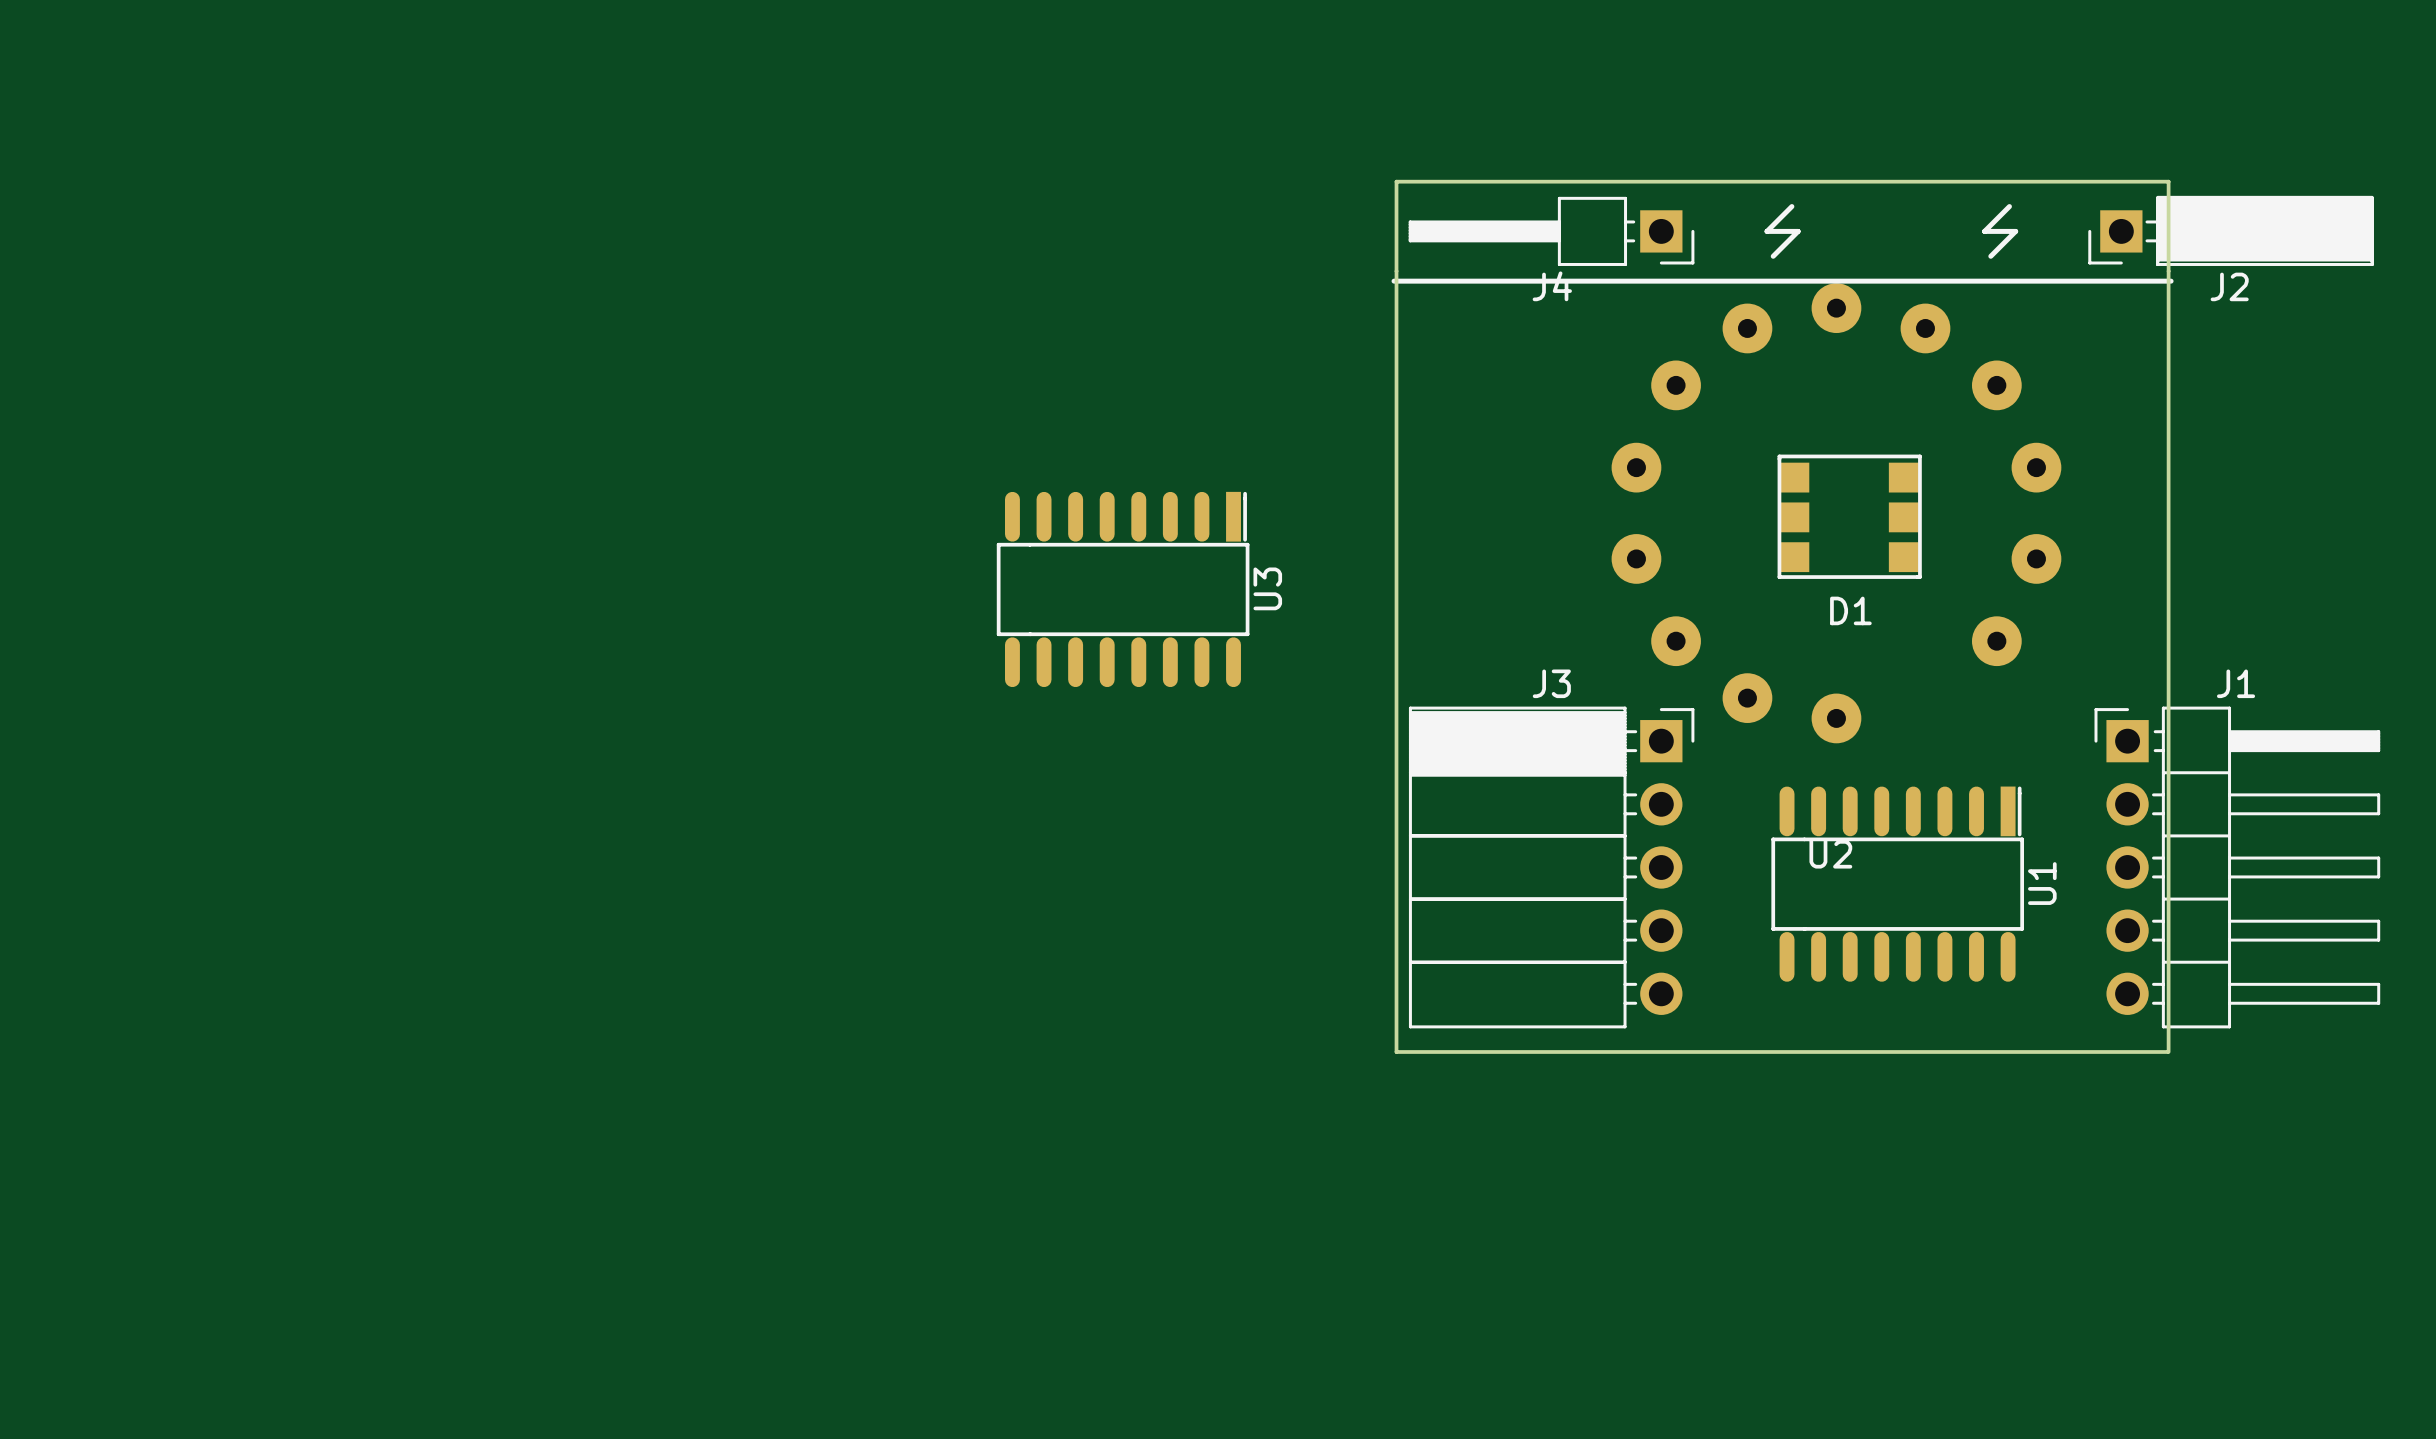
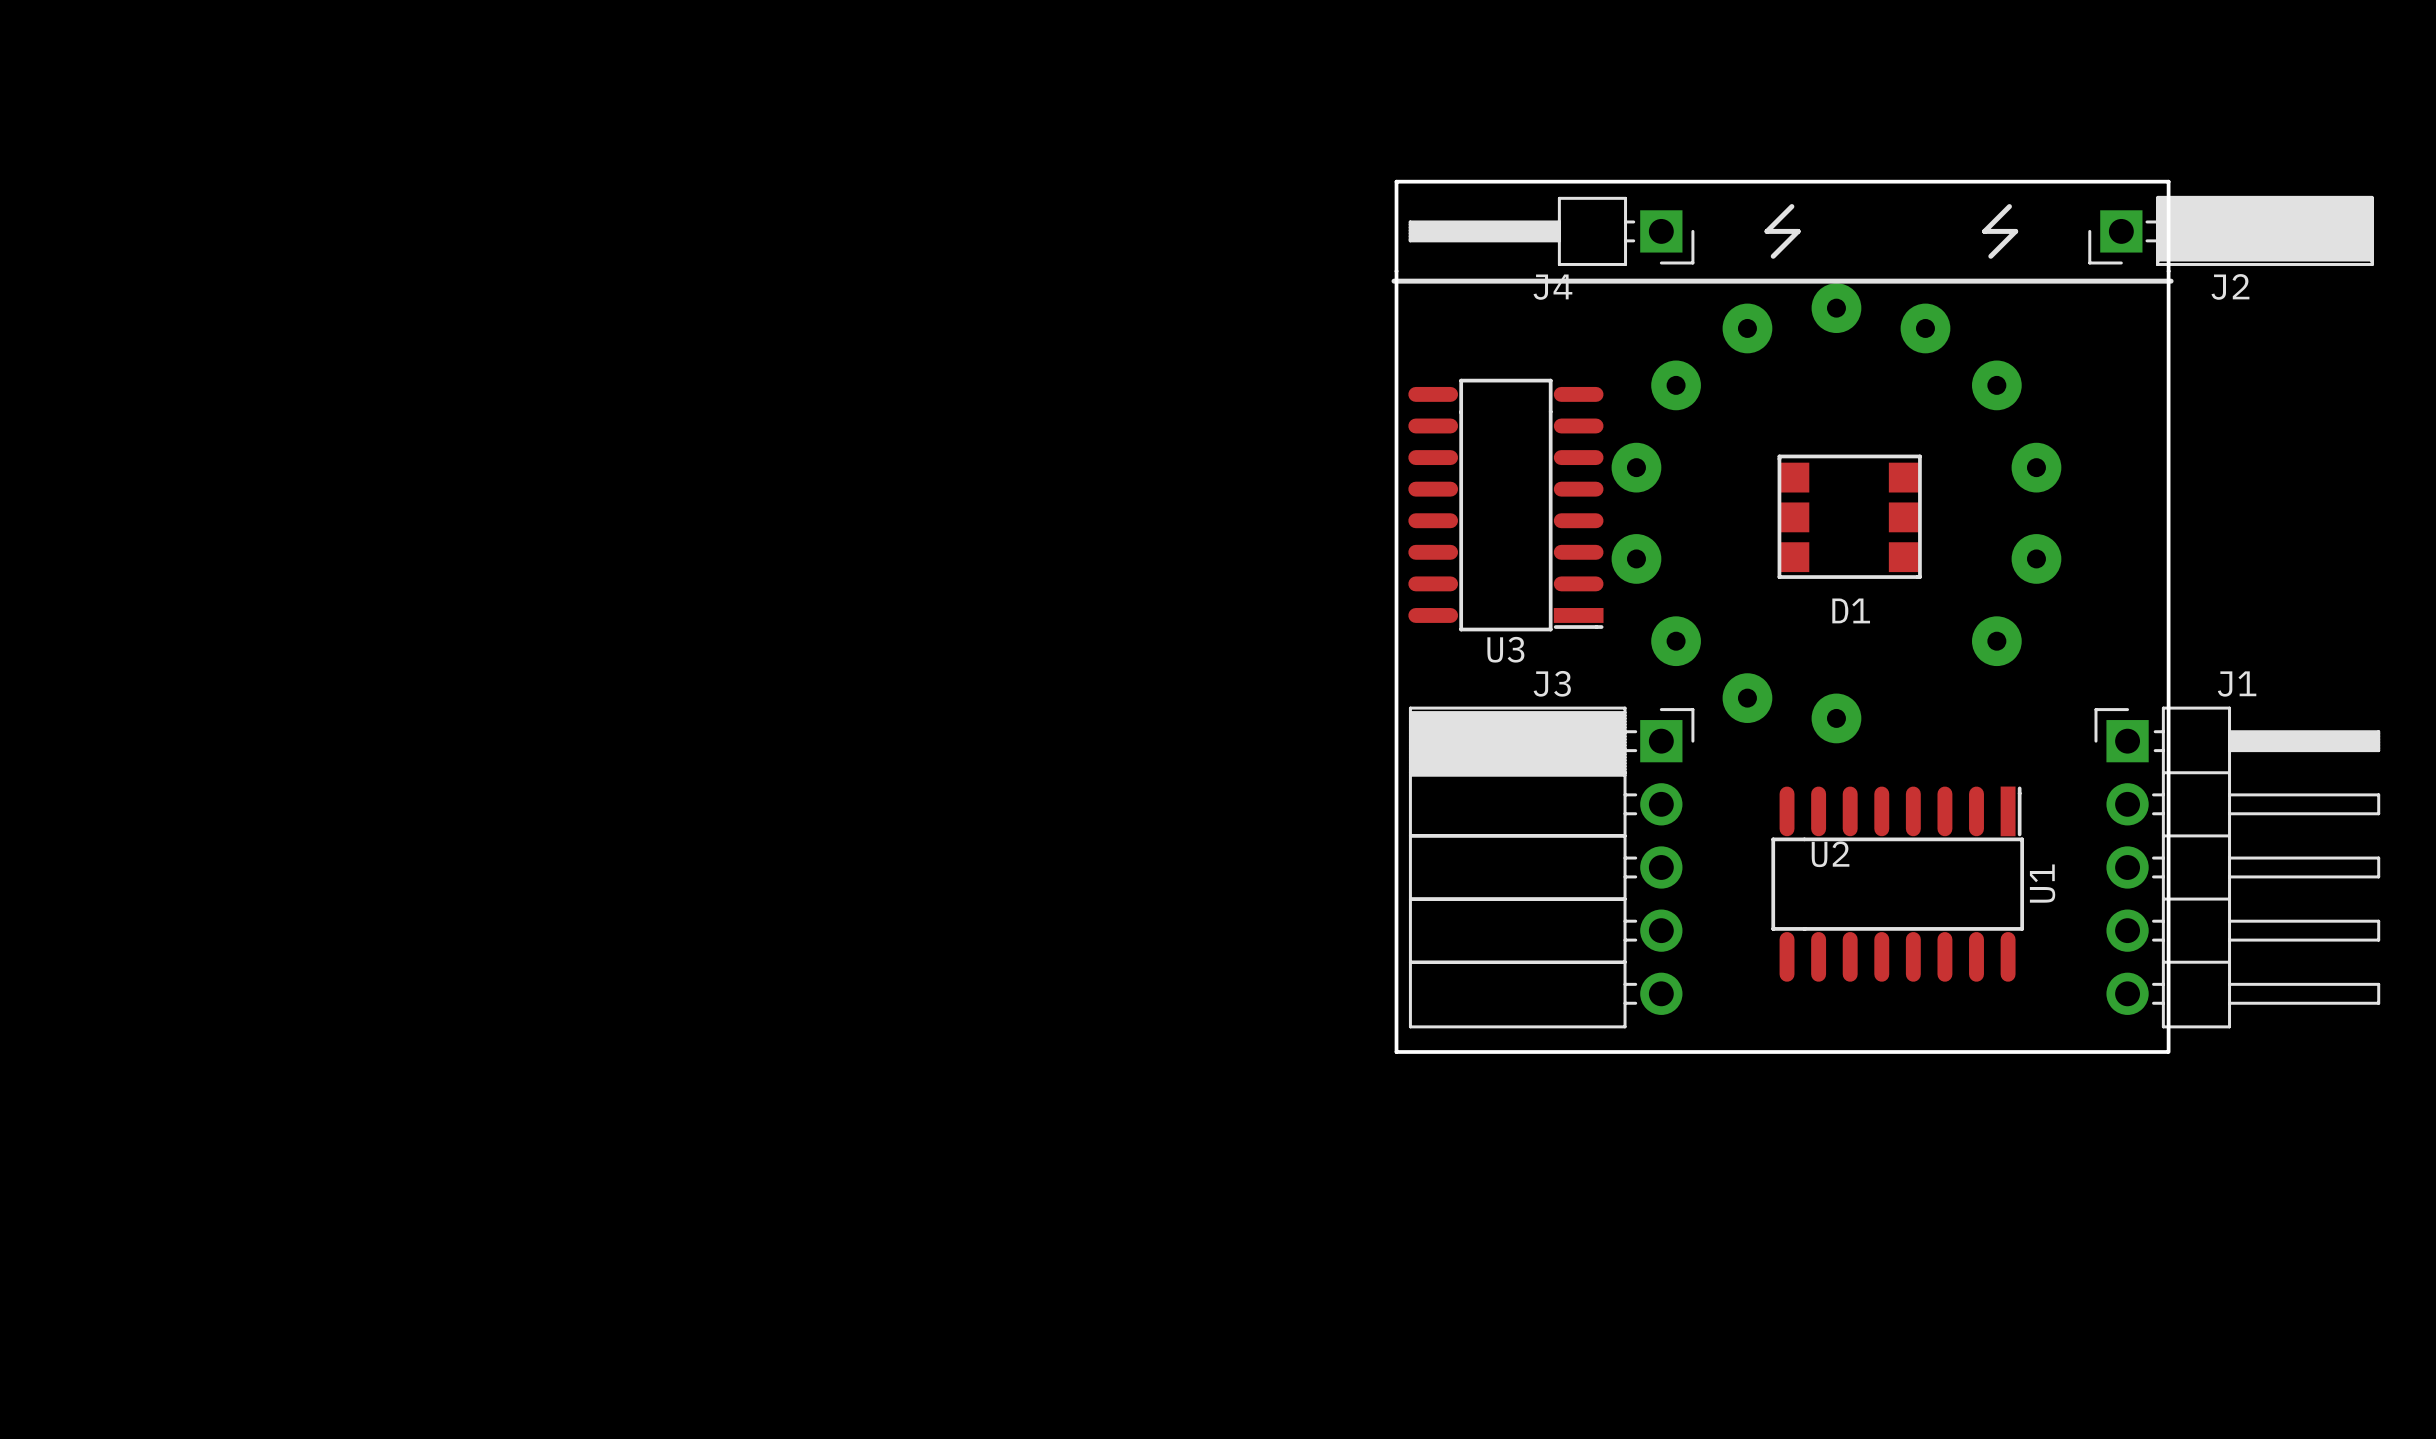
U3 rotation: 0° (1123, 589) -> 90° clockwise (1505, 505)
U3 position: (1123, 589) -> (1505, 505)

